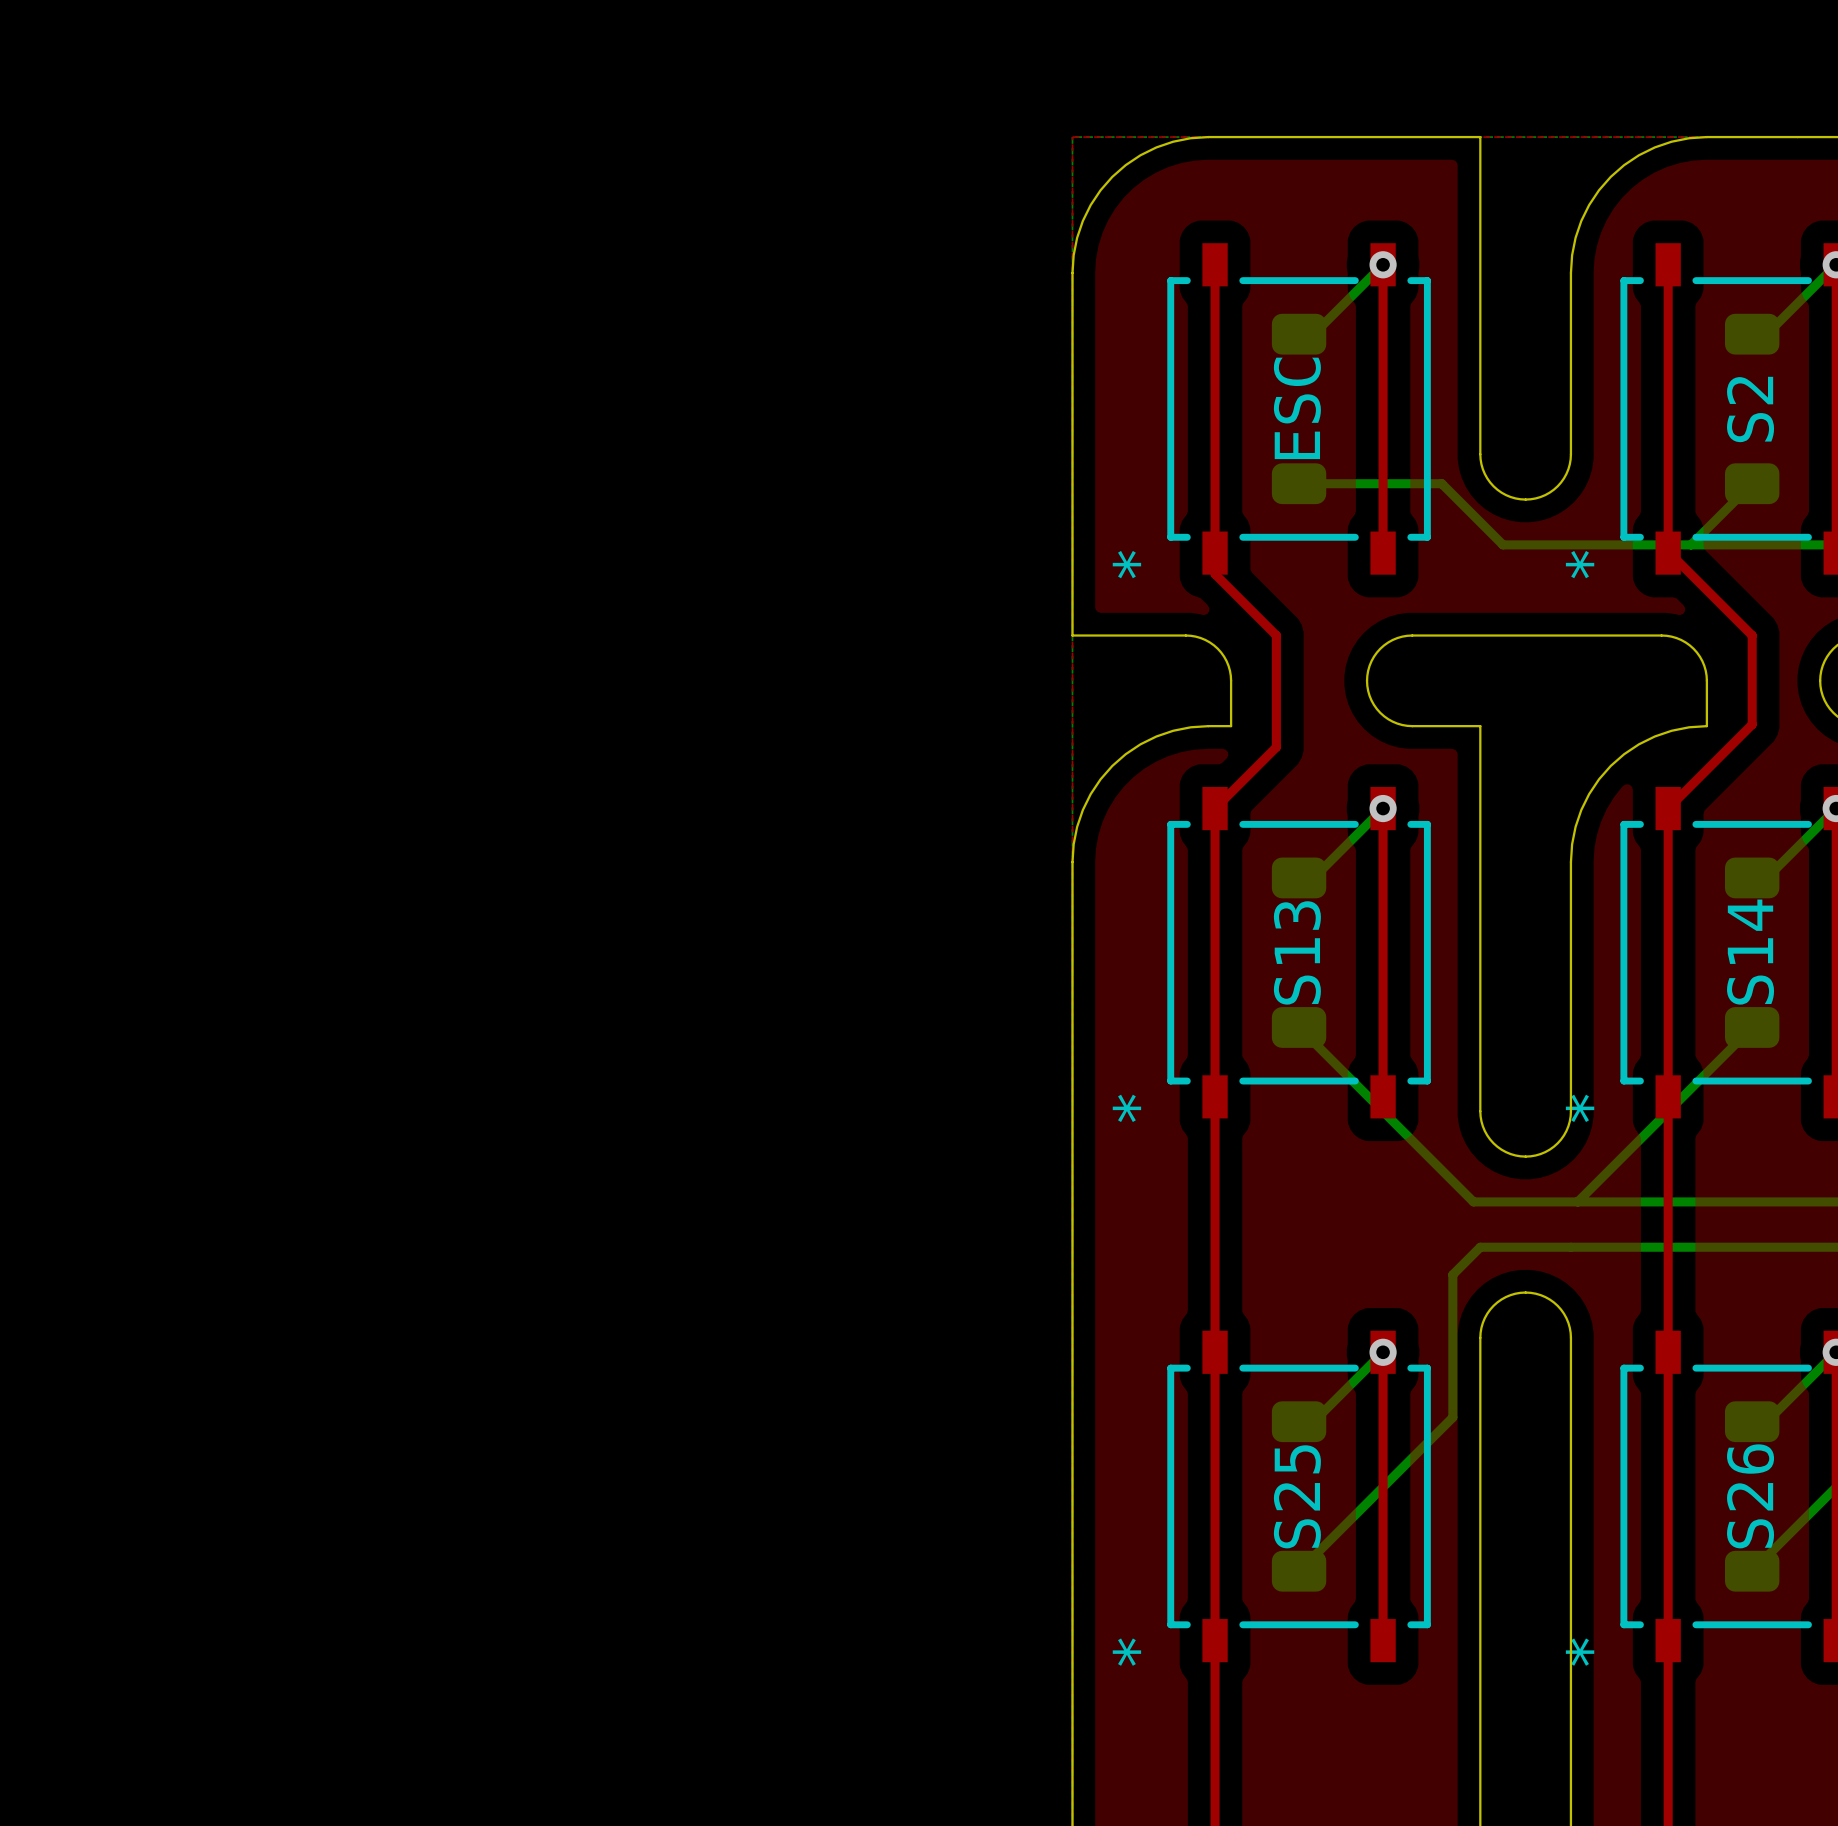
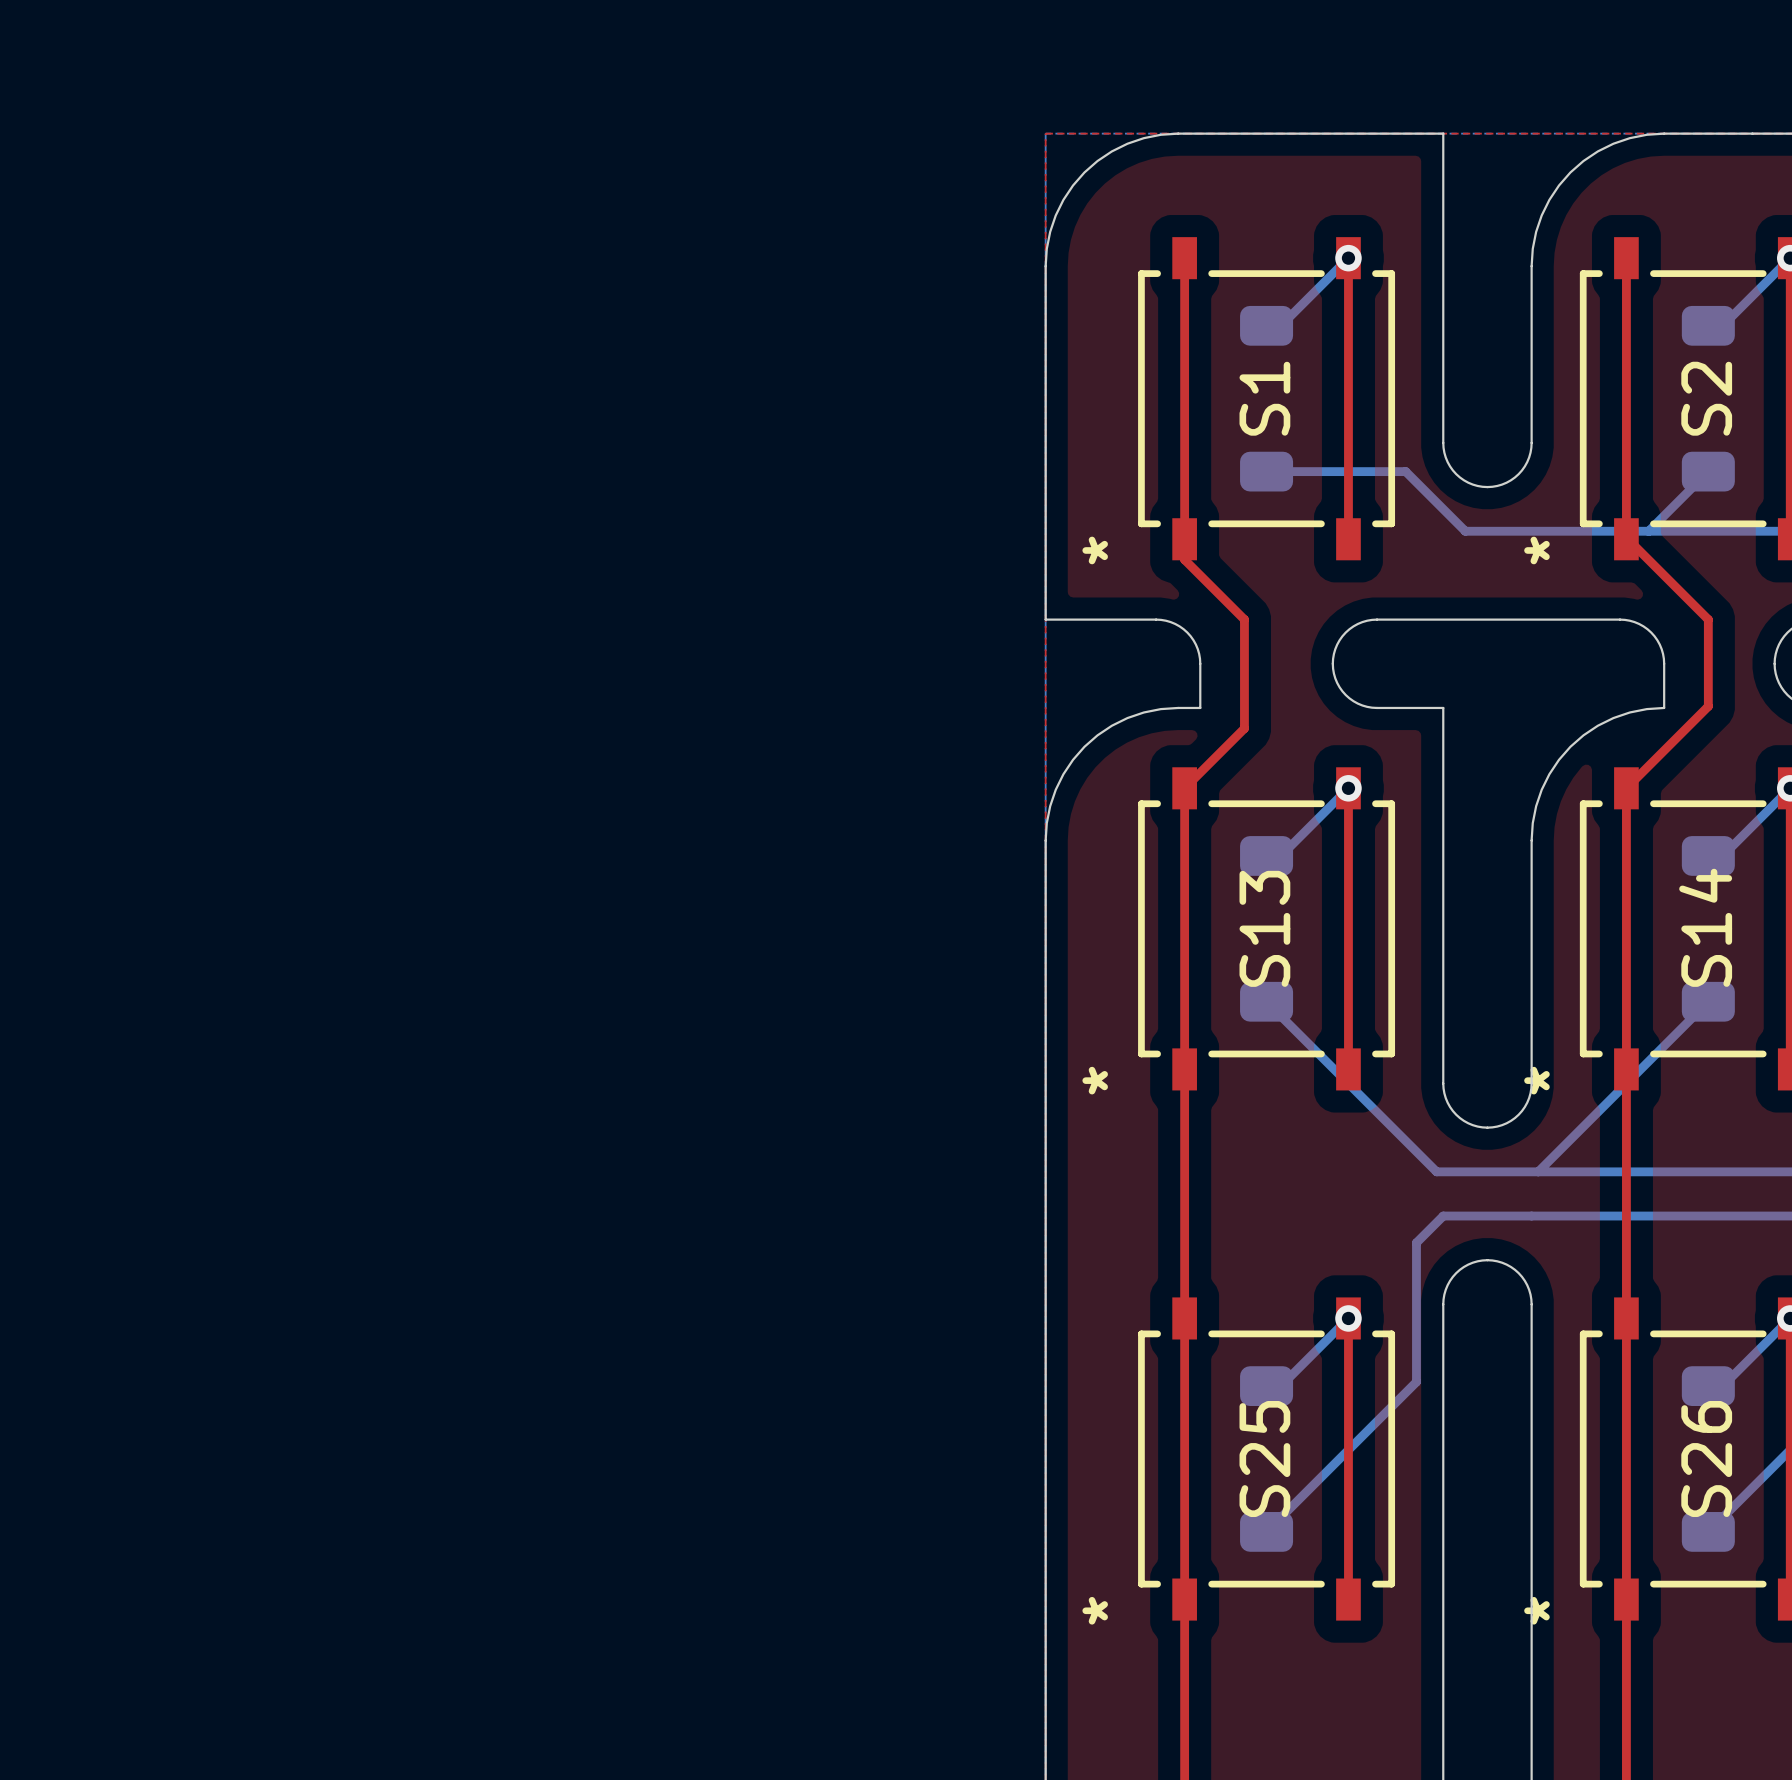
S1 name: none -> S1 (1264, 398)
S1 value: ESC (1297, 408) -> none

